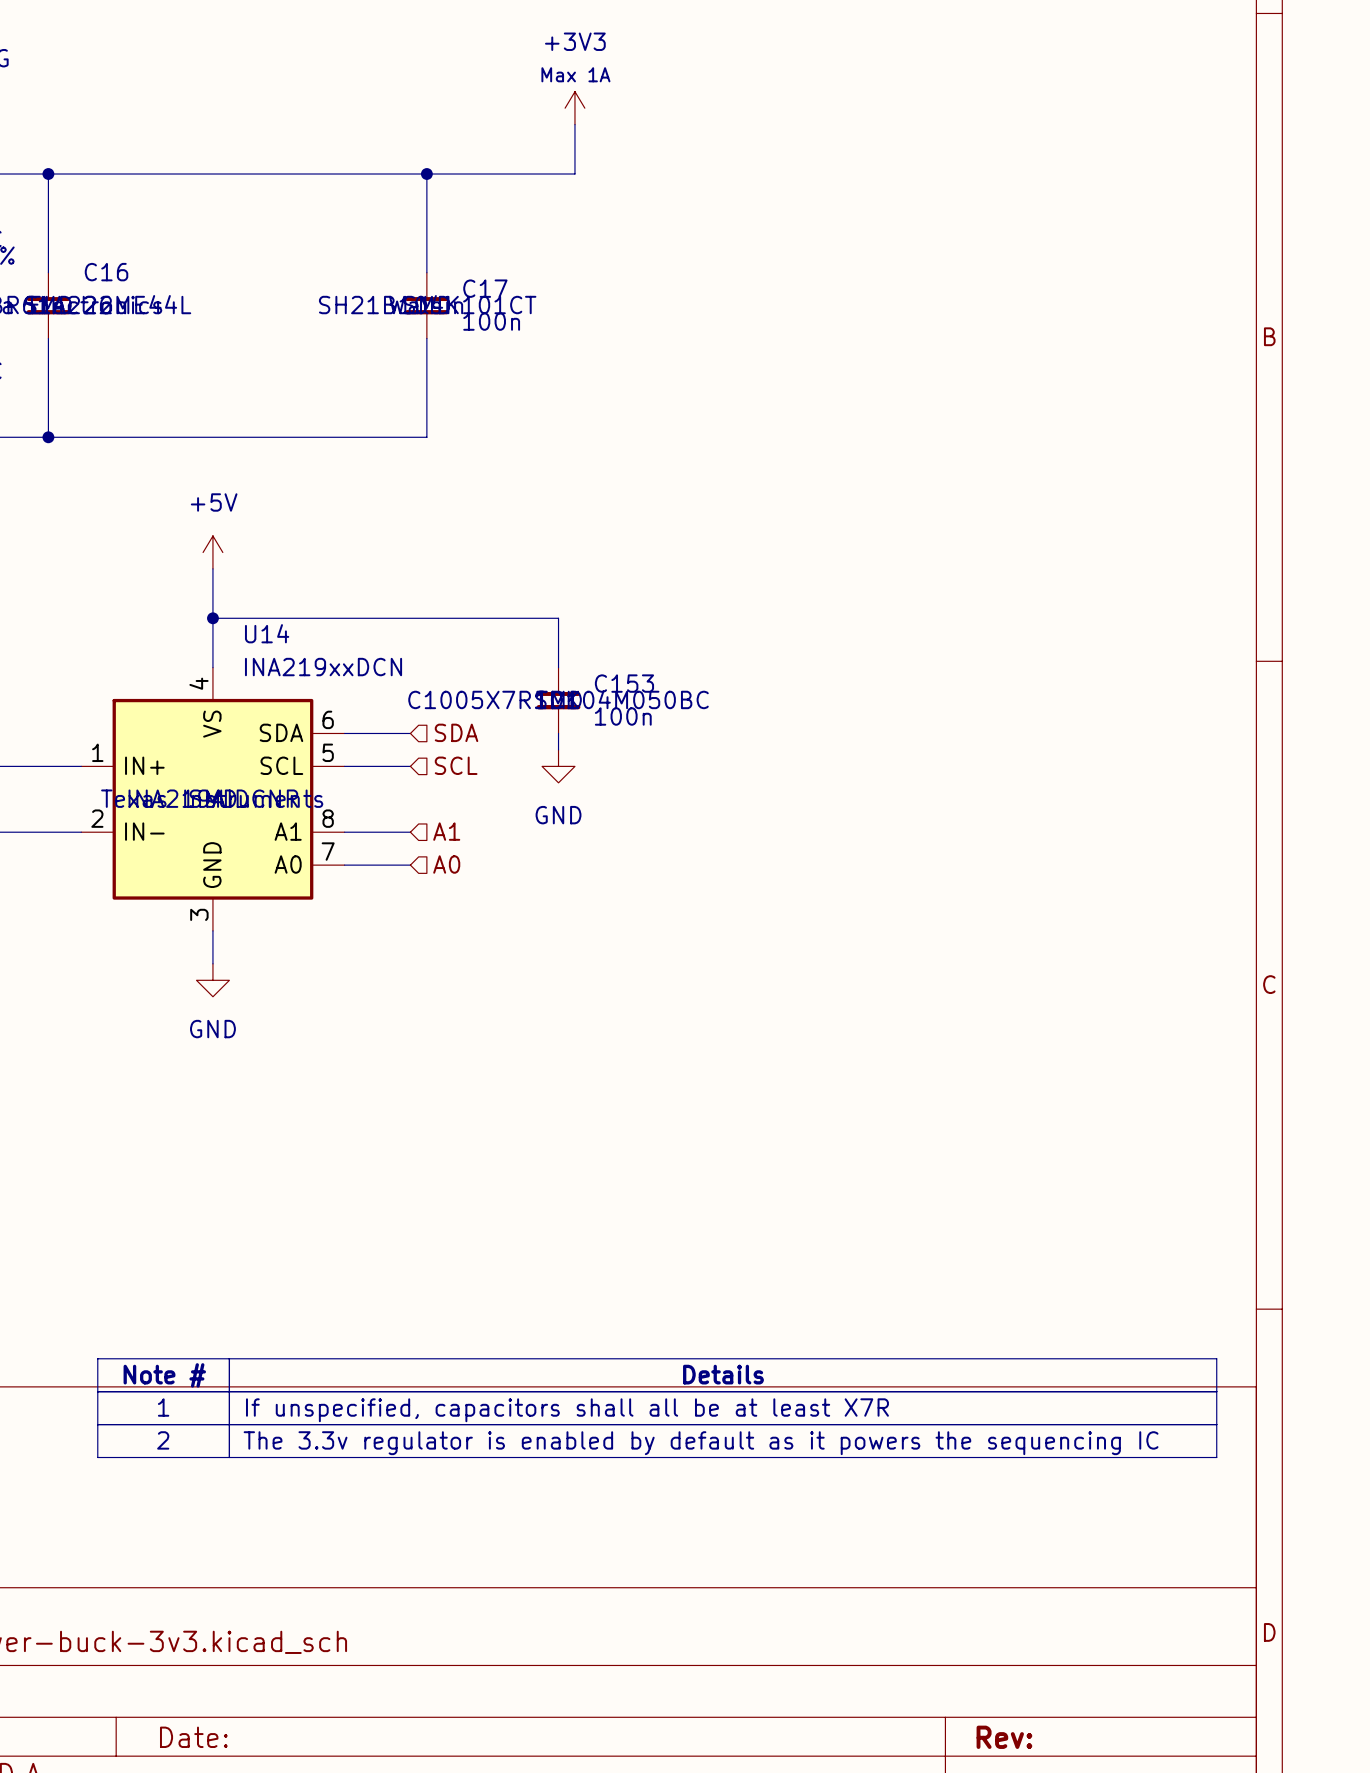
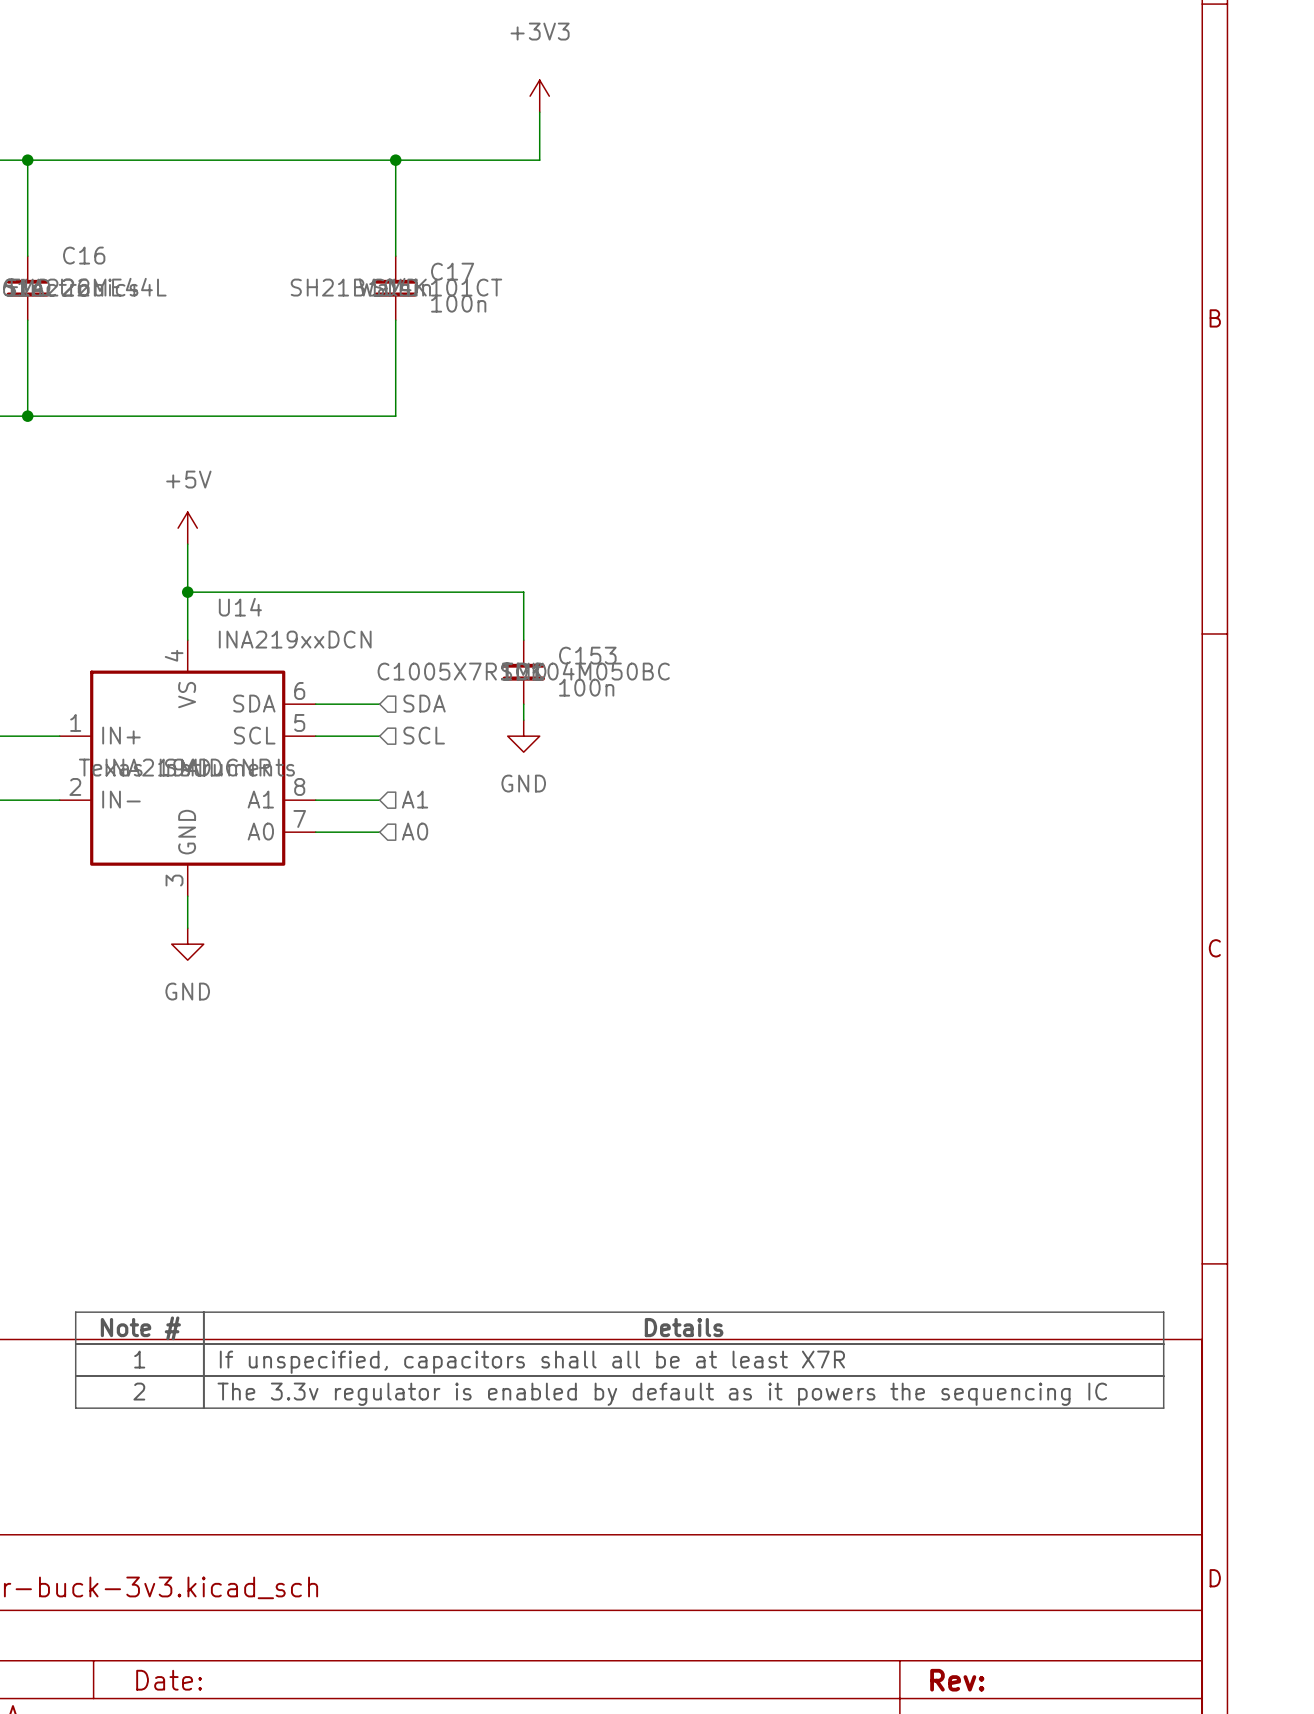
power symbol text: Max 1A (575, 74) -> none

